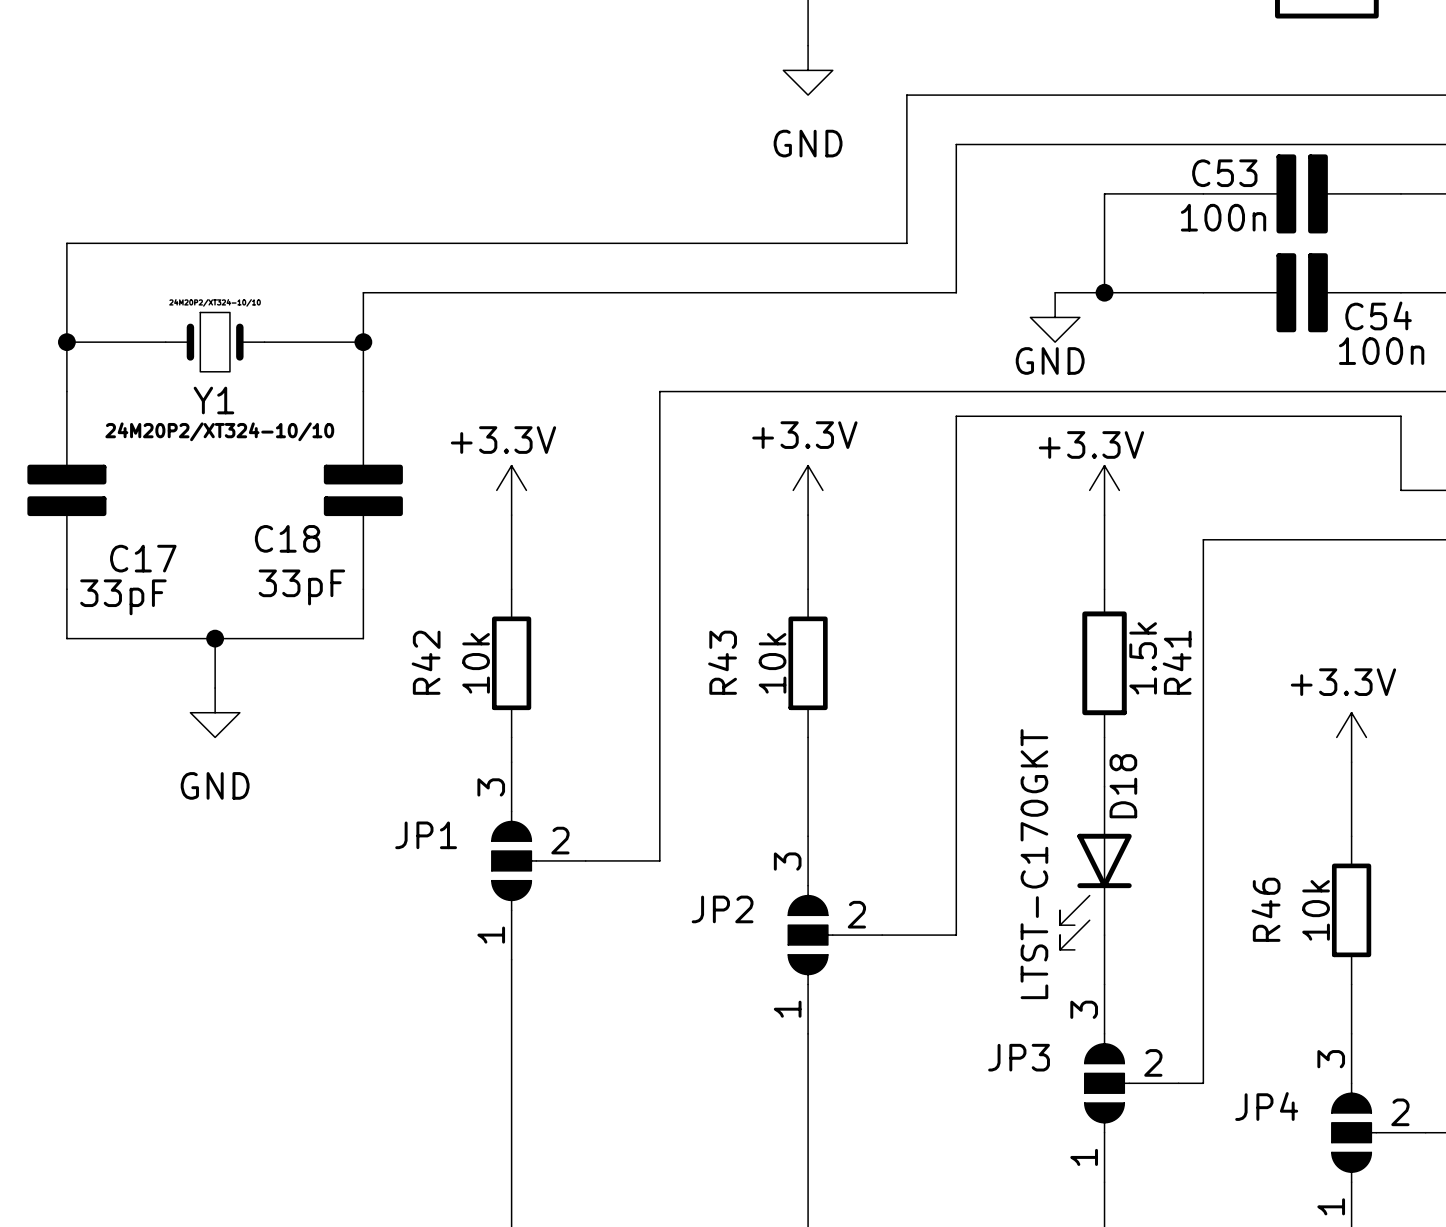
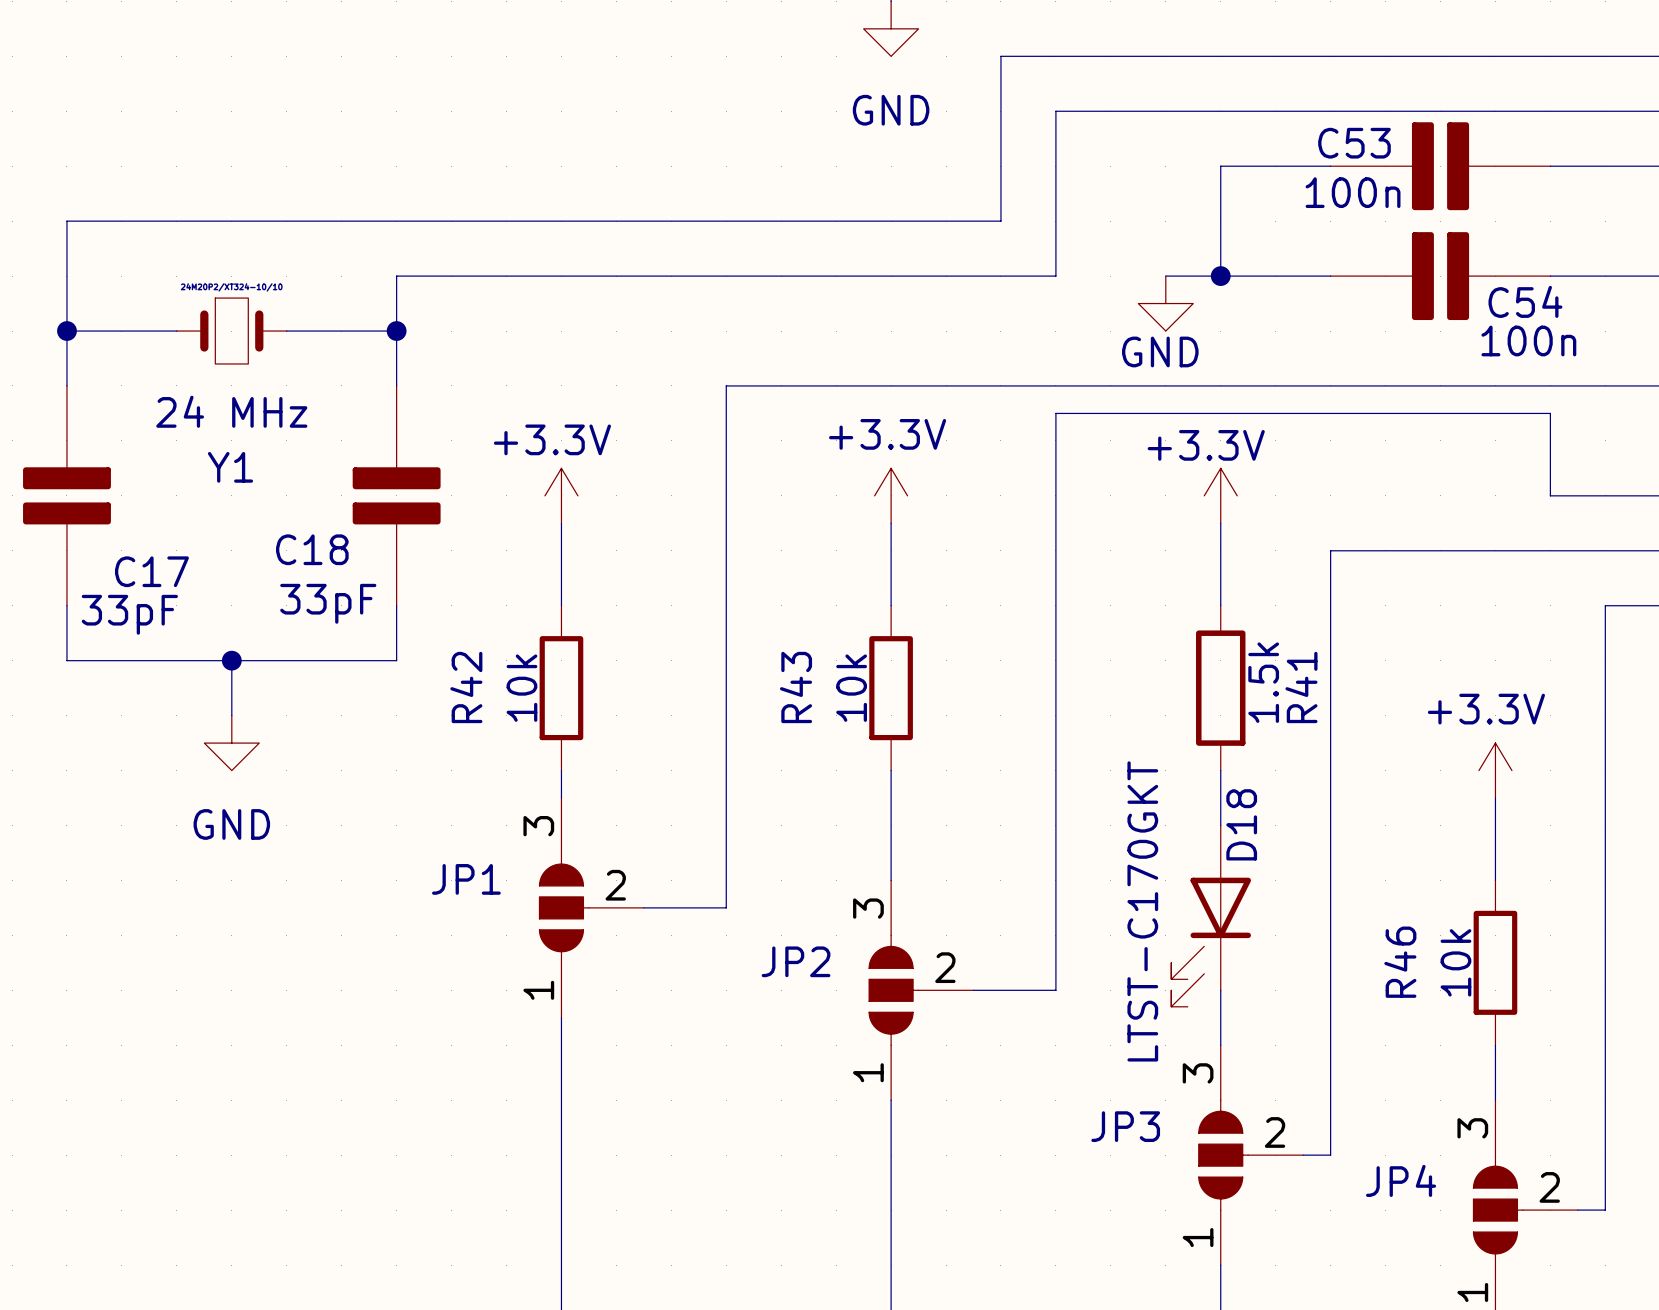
Y1 name position: Y1 (213, 400) -> Y1 (230, 467)
Y1 value: 24M20P2/XT324-10/10 (219, 431) -> 24 MHz (231, 411)

